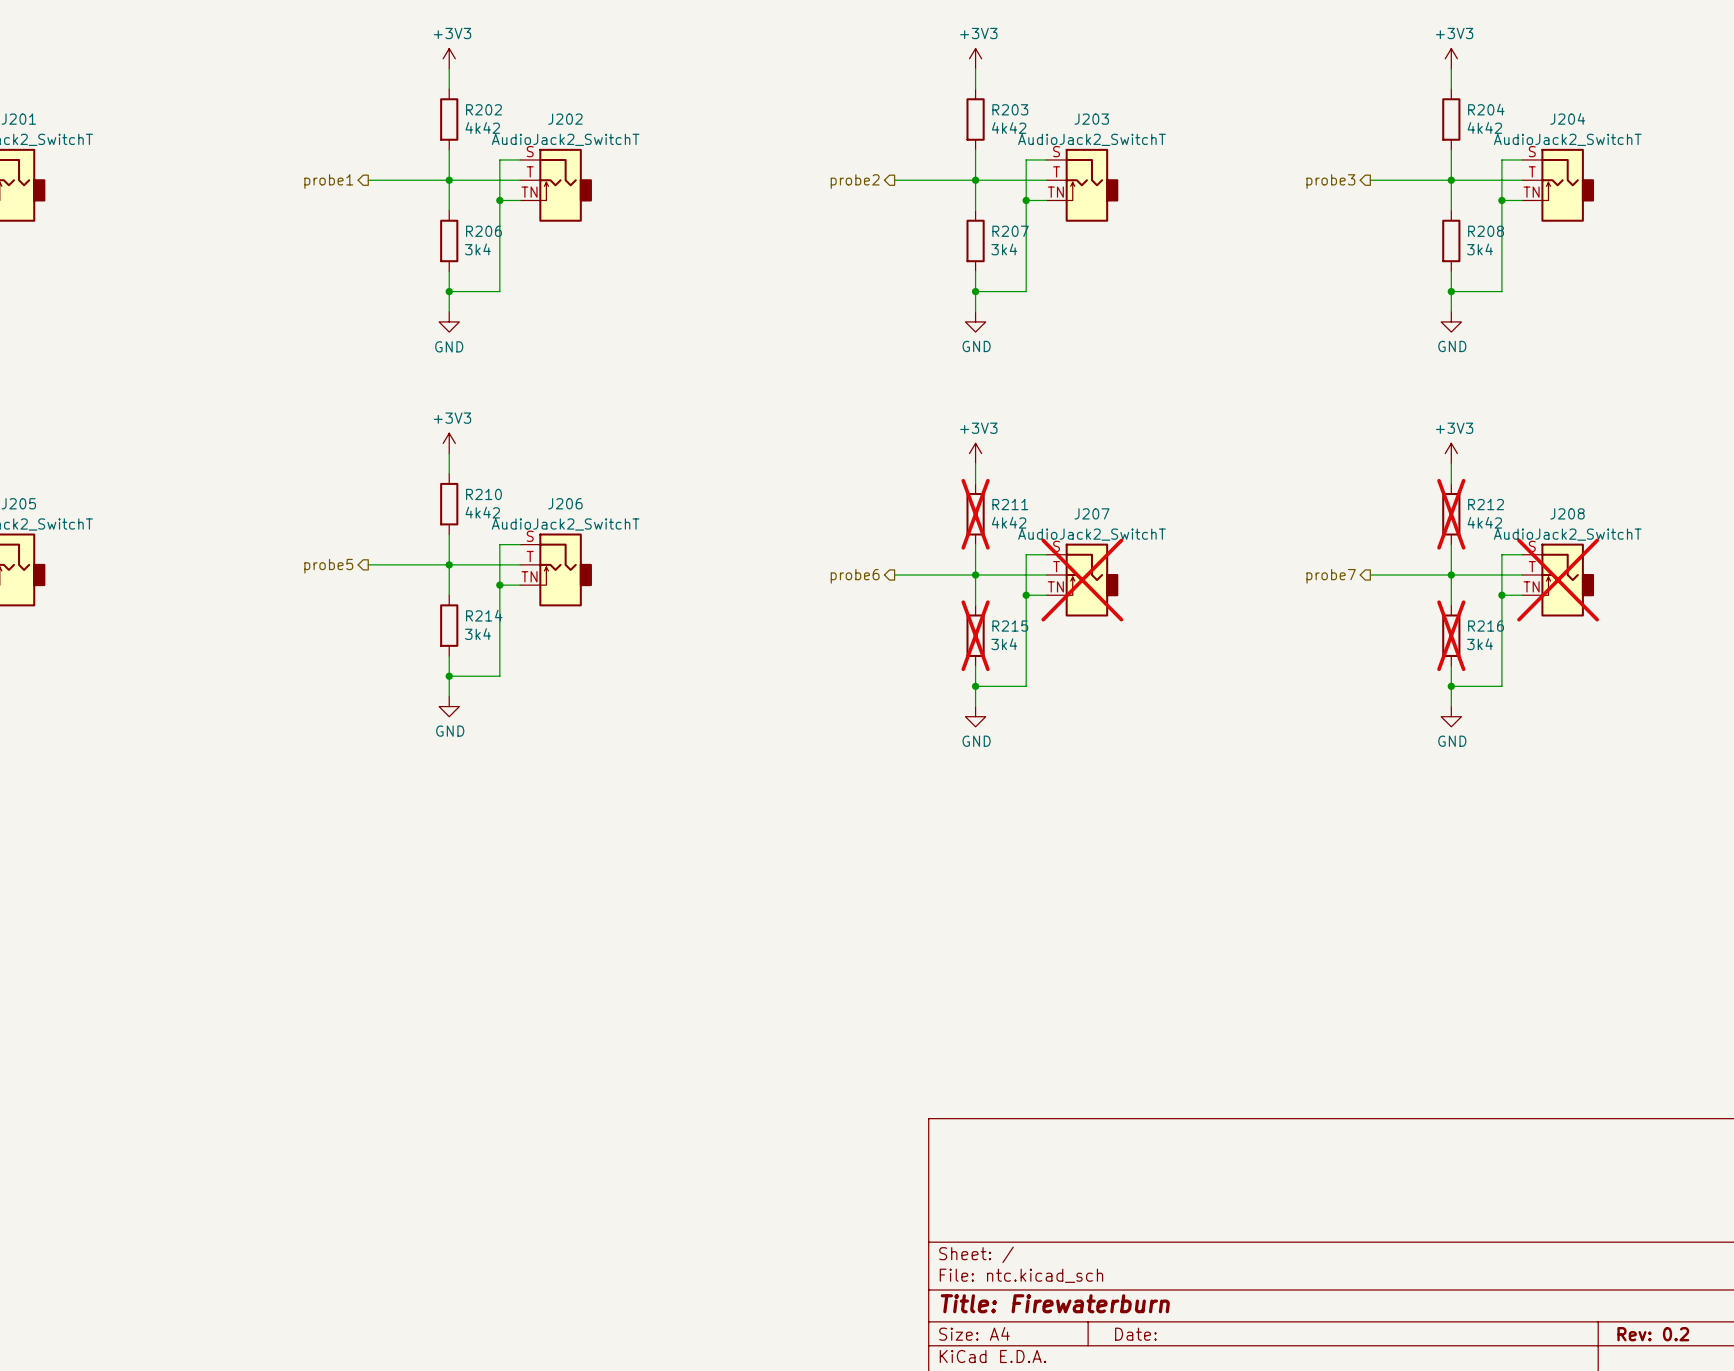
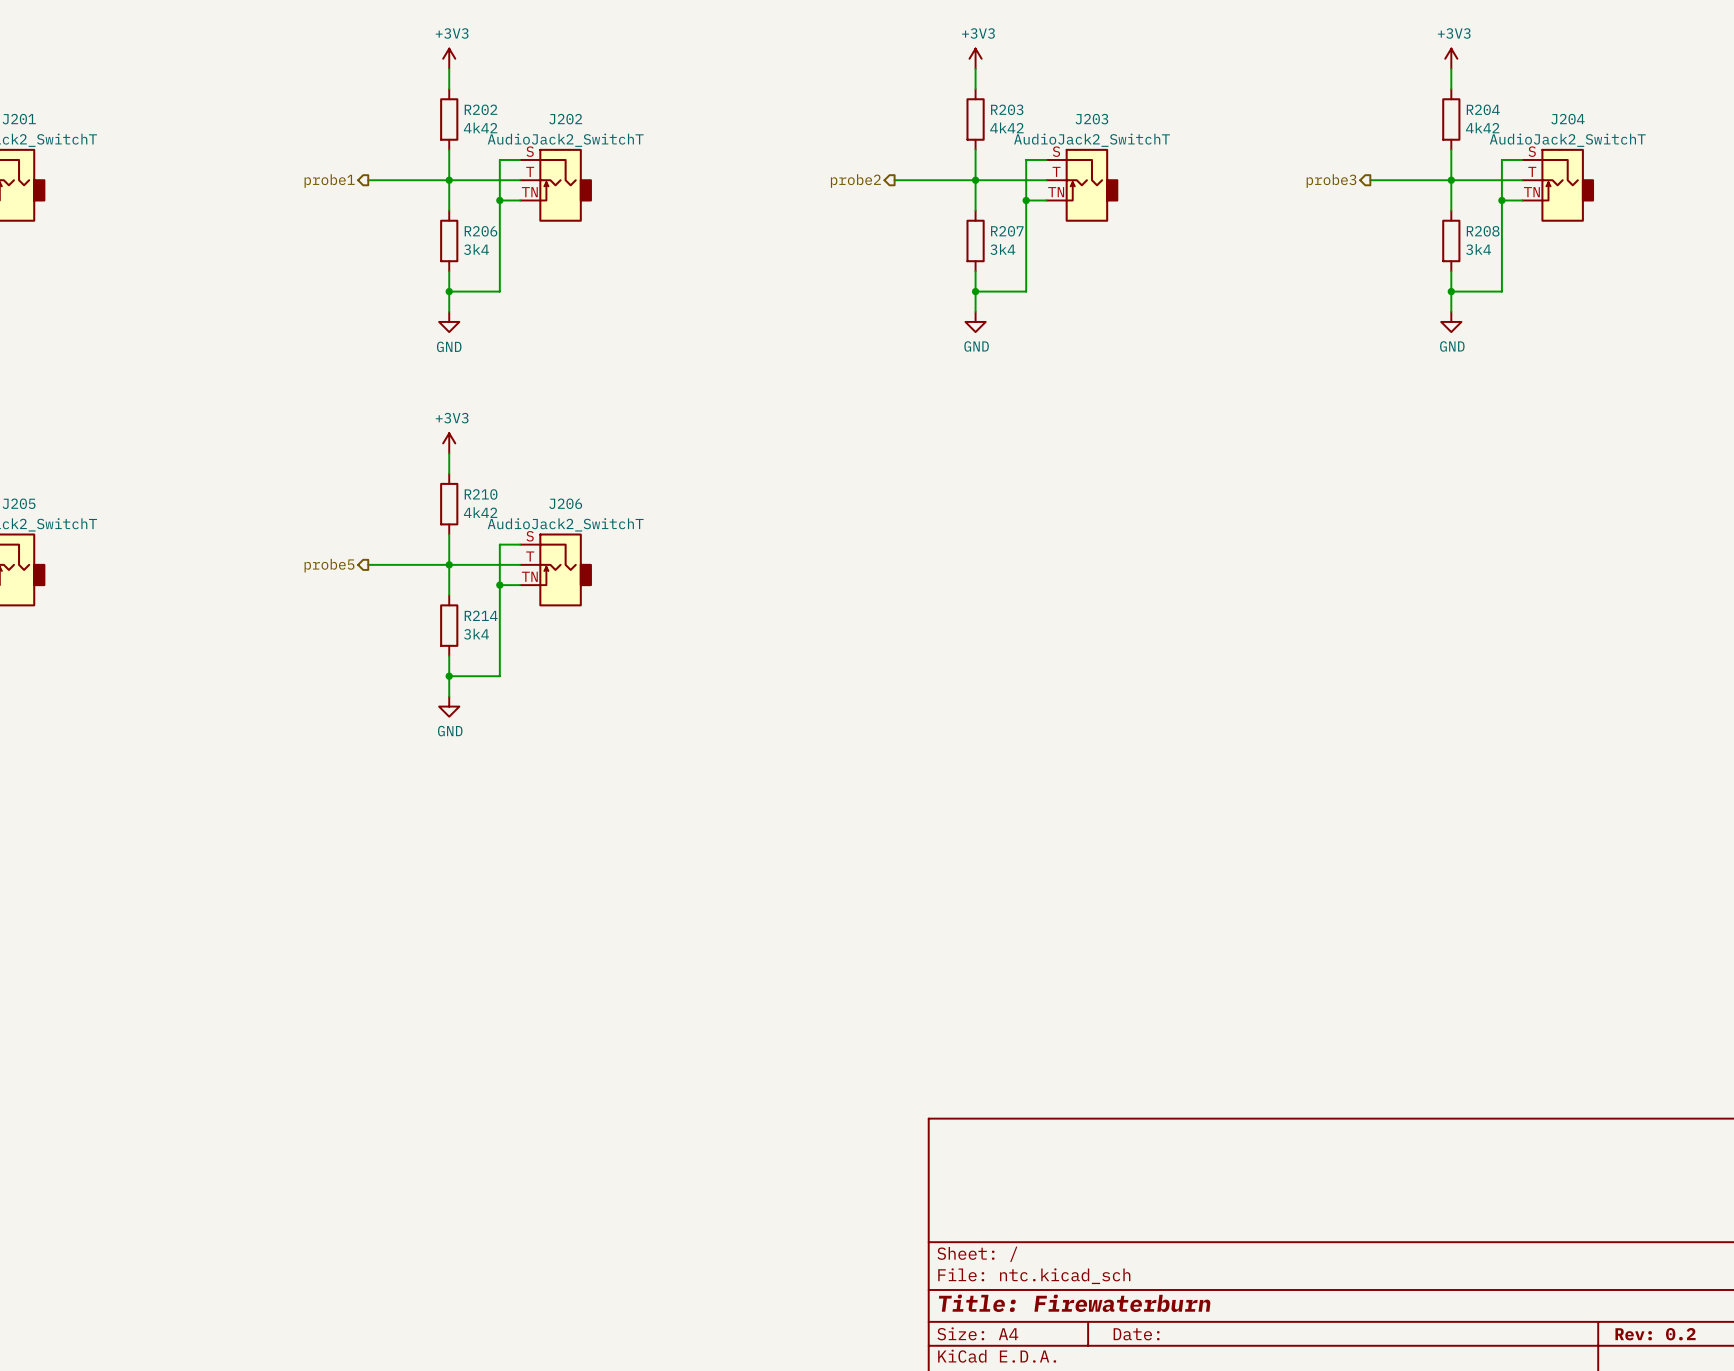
power symbol: +3V3 (975, 453) -> none
power symbol: +3V3 (1451, 453) -> none
wire: (975, 463) (975, 483) -> none
wire: (1451, 463) (1451, 483) -> none
R211: 4k42 (975, 514) -> none
R212: 4k42 (1451, 514) -> none
wire: (975, 544) (975, 605) -> none
wire: (1451, 544) (1451, 605) -> none
wire: (1046, 554) (1026, 554) (1026, 686) (975, 686) -> none
wire: (1522, 554) (1501, 554) (1501, 686) (1451, 686) -> none
wire: (894, 575) (1046, 575) -> none
junction: (975, 575) -> none
wire: (1370, 575) (1522, 575) -> none
junction: (1451, 575) -> none
hierarchical label: probe6 (855, 576) -> none
hierarchical label: probe7 (1331, 576) -> none
J207: AudioJack2_SwitchT (1082, 580) -> none
J208: AudioJack2_SwitchT (1558, 580) -> none
wire: (1026, 595) (1046, 595) -> none
junction: (1026, 595) -> none
wire: (1501, 595) (1522, 595) -> none
junction: (1501, 595) -> none
R215: 3k4 (975, 635) -> none
R216: 3k4 (1451, 635) -> none
wire: (975, 666) (975, 706) -> none
wire: (1451, 666) (1451, 706) -> none
junction: (975, 686) -> none
junction: (1451, 686) -> none
power symbol: GND (975, 716) -> none
power symbol: GND (1451, 716) -> none

